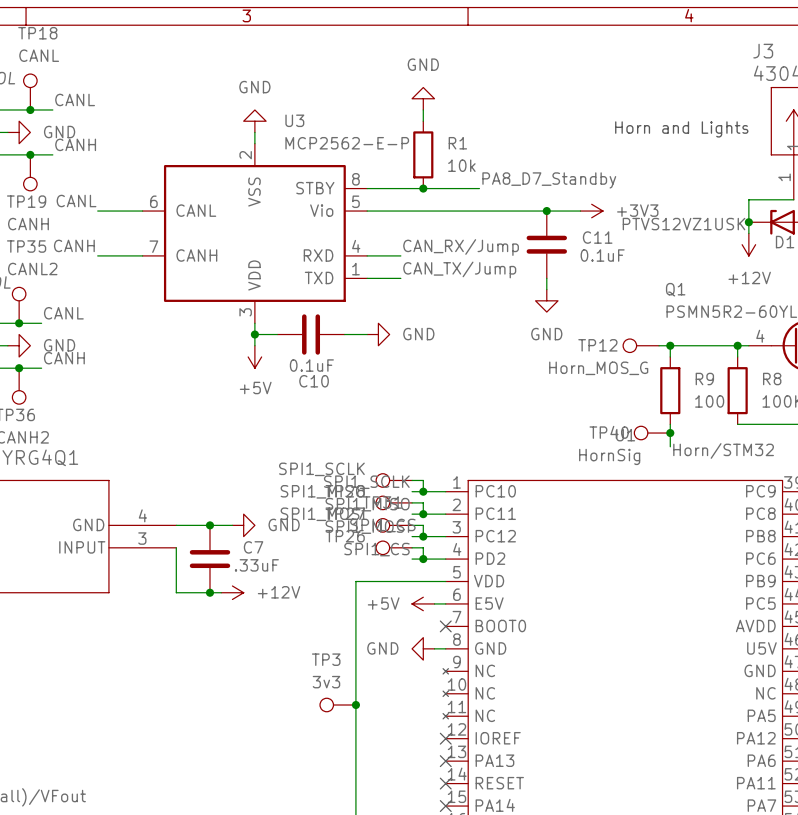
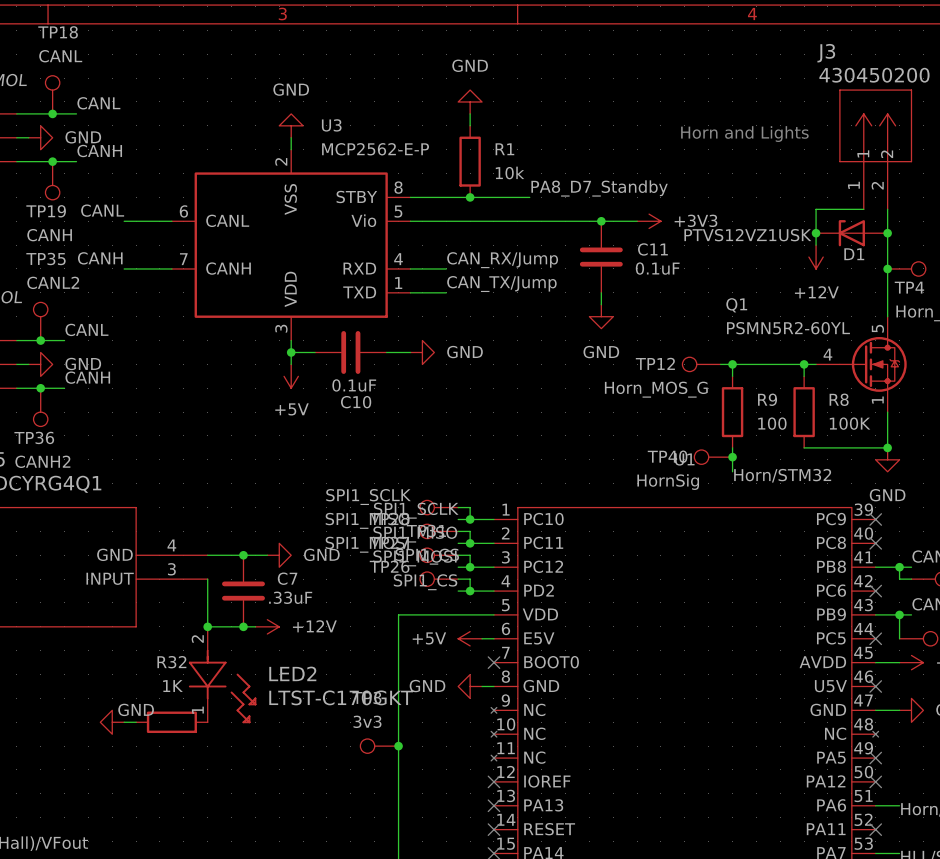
junction: none -> (207, 626)
LED2: none -> LTST-C170GKT (222, 675)
power symbol: none -> GND (112, 722)
wire: none -> (124, 722) (136, 722)
R32: none -> 1K (171, 722)

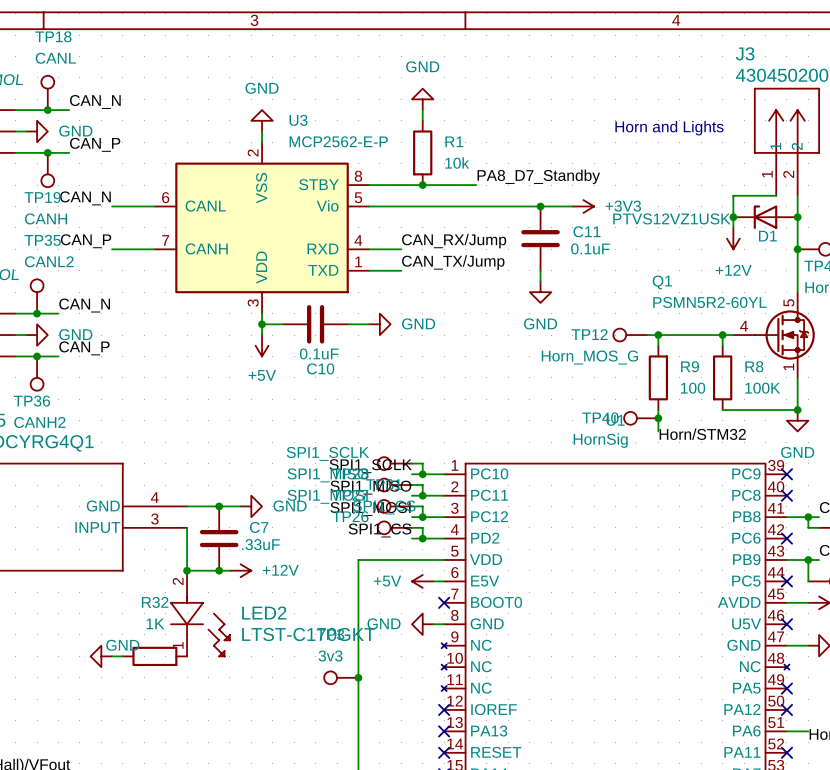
label: CANL (98, 103) -> CAN_N (95, 101)
label: CANH (99, 151) -> CAN_P (95, 144)
label: CANL (102, 210) -> CAN_N (85, 198)
label: CANH (100, 258) -> CAN_P (86, 241)
label: CANL (86, 329) -> CAN_N (84, 305)
label: CANH (87, 377) -> CAN_P (84, 348)

